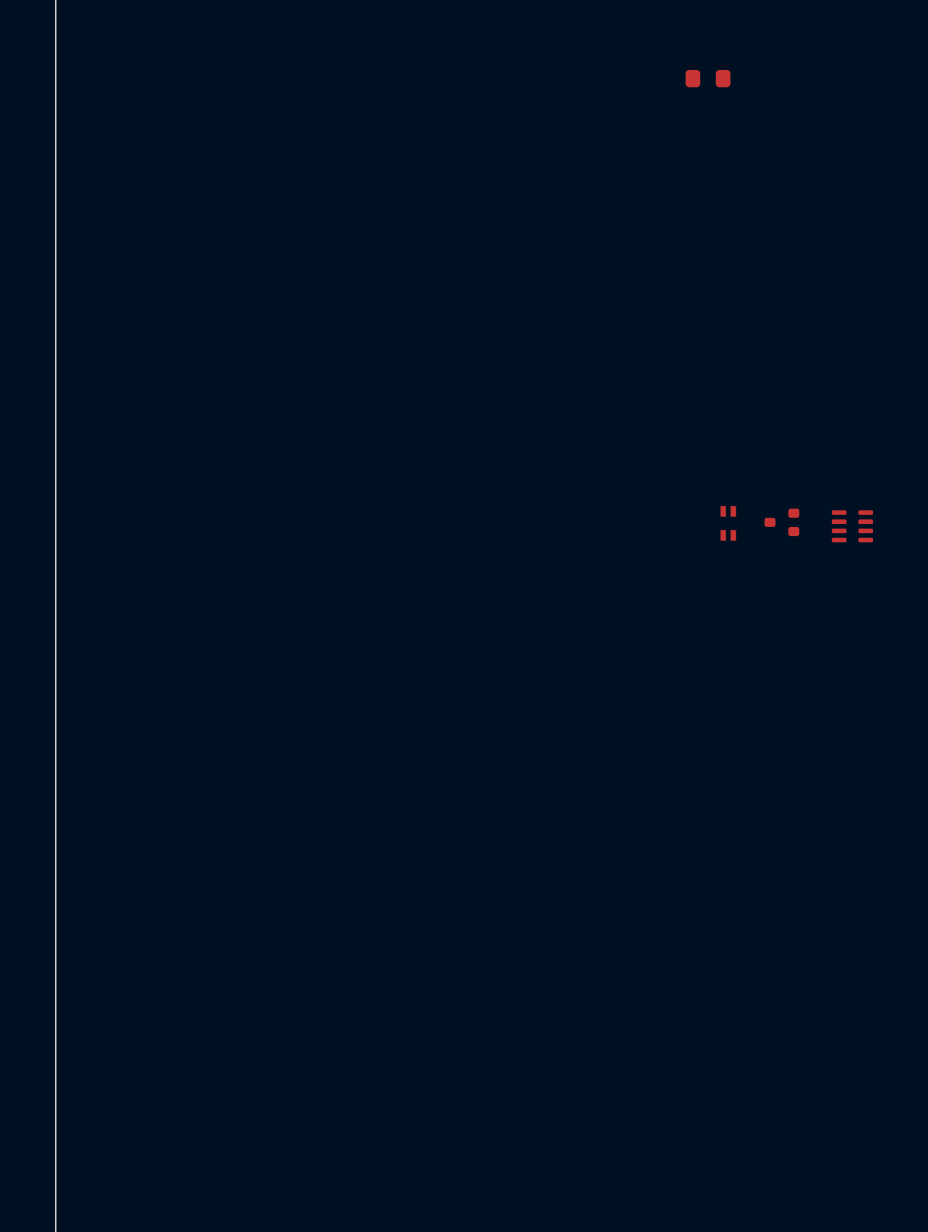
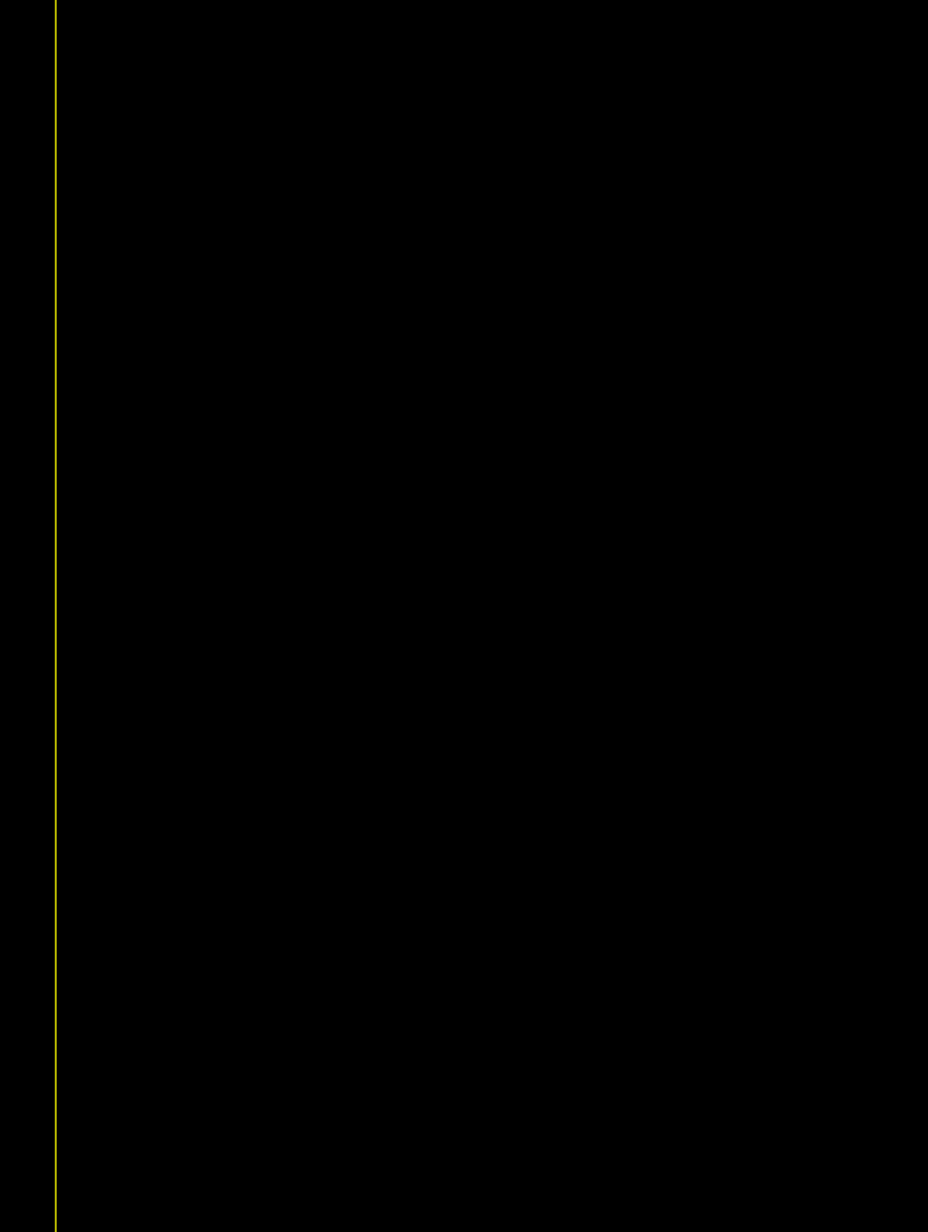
part: (708, 78) -> none
part: (781, 522) -> none
part: (728, 523) -> none
part: (852, 526) -> none

